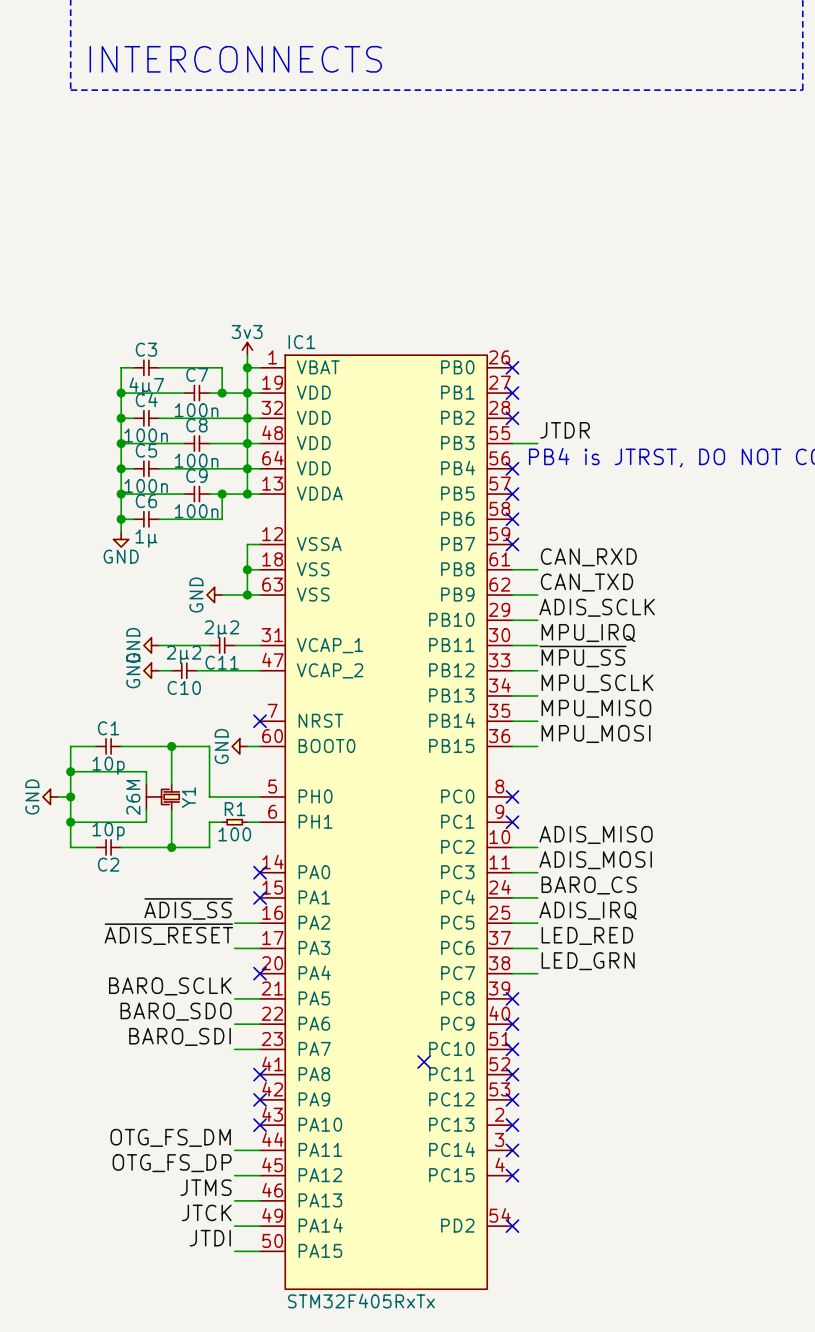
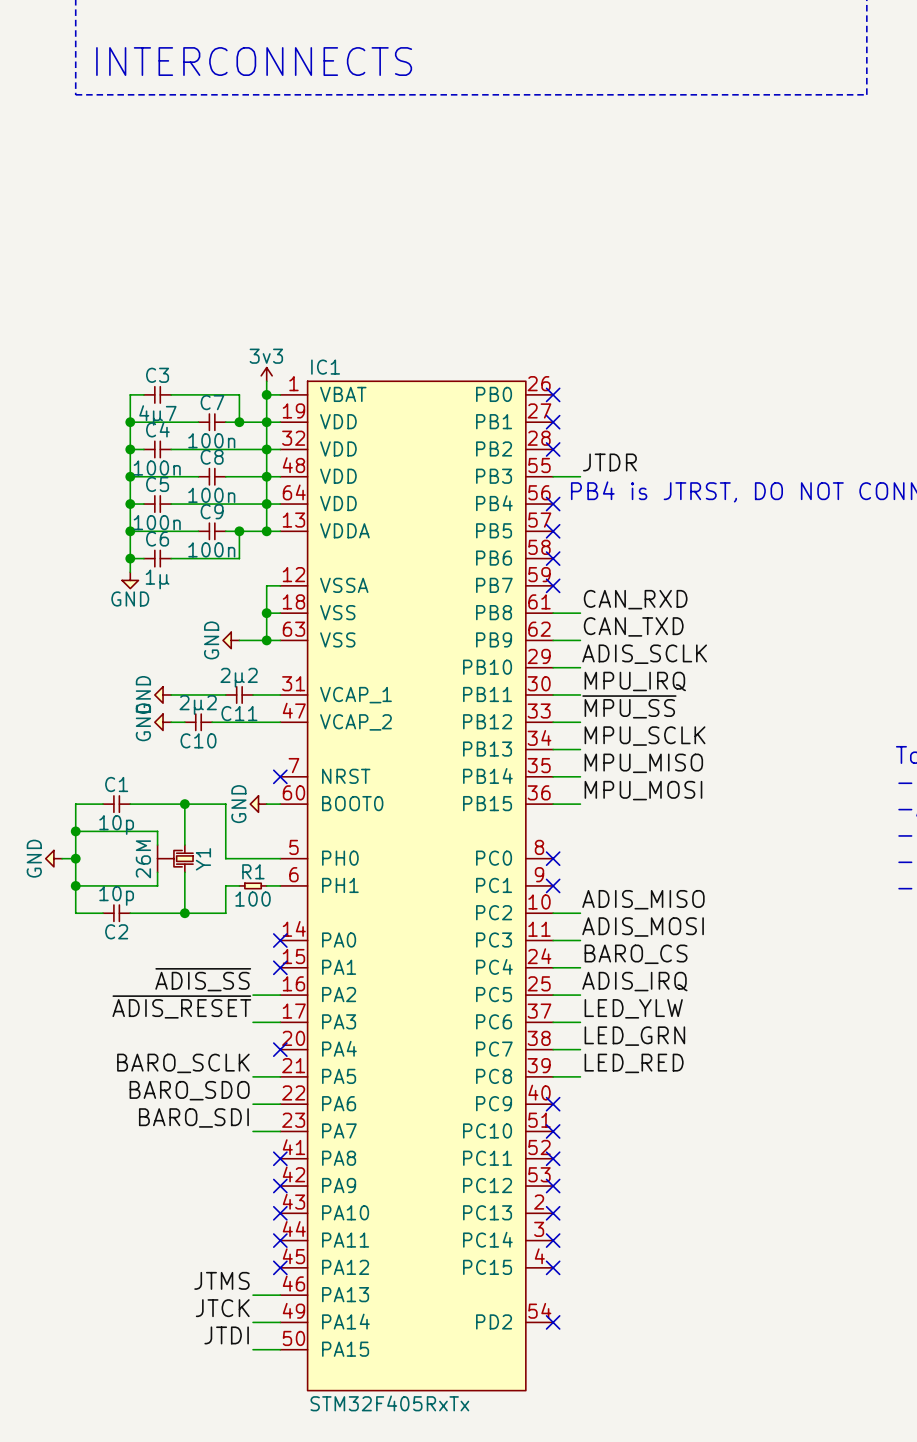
label: LED_RED (587, 935) -> LED_YLW (633, 1008)
label: none -> LED_RED (634, 1063)
wire: none -> (553, 1076) (580, 1076)
no-connect mark: (512, 998) -> none
no-connect mark: (424, 1062) -> none
label: OTG_FS_DM (170, 1137) -> none
wire: (234, 1150) (260, 1150) -> none
no-connect mark: none -> (280, 1240)
label: OTG_FS_DP (172, 1163) -> none
wire: (234, 1175) (260, 1175) -> none
no-connect mark: none -> (280, 1267)

